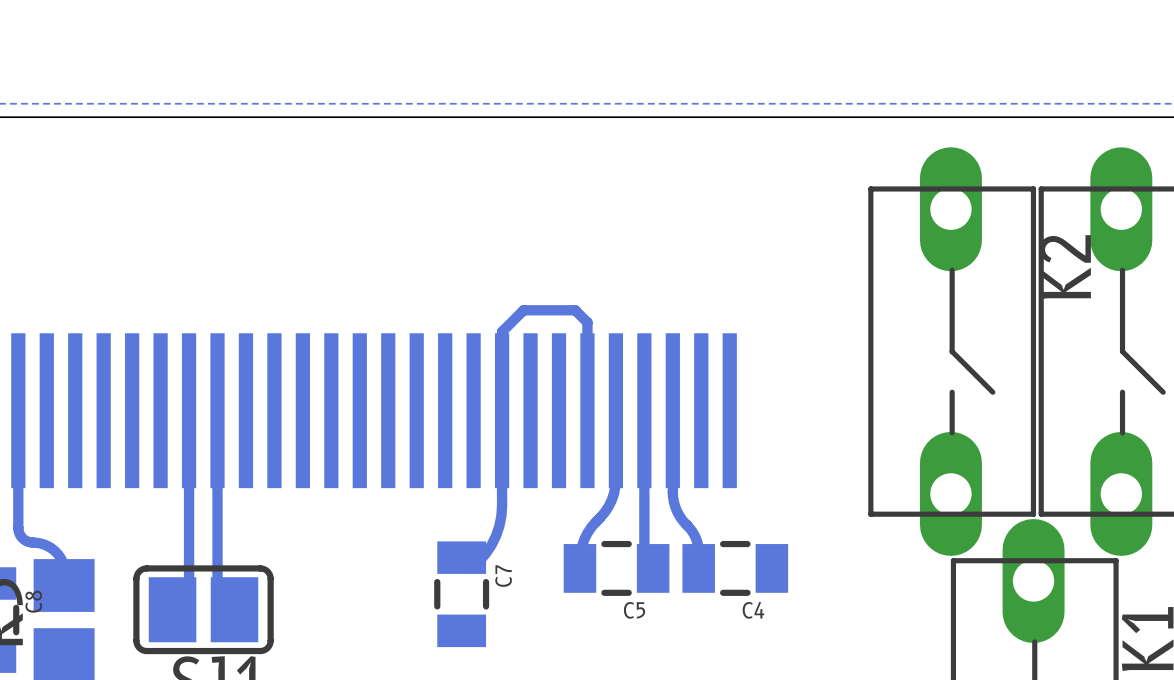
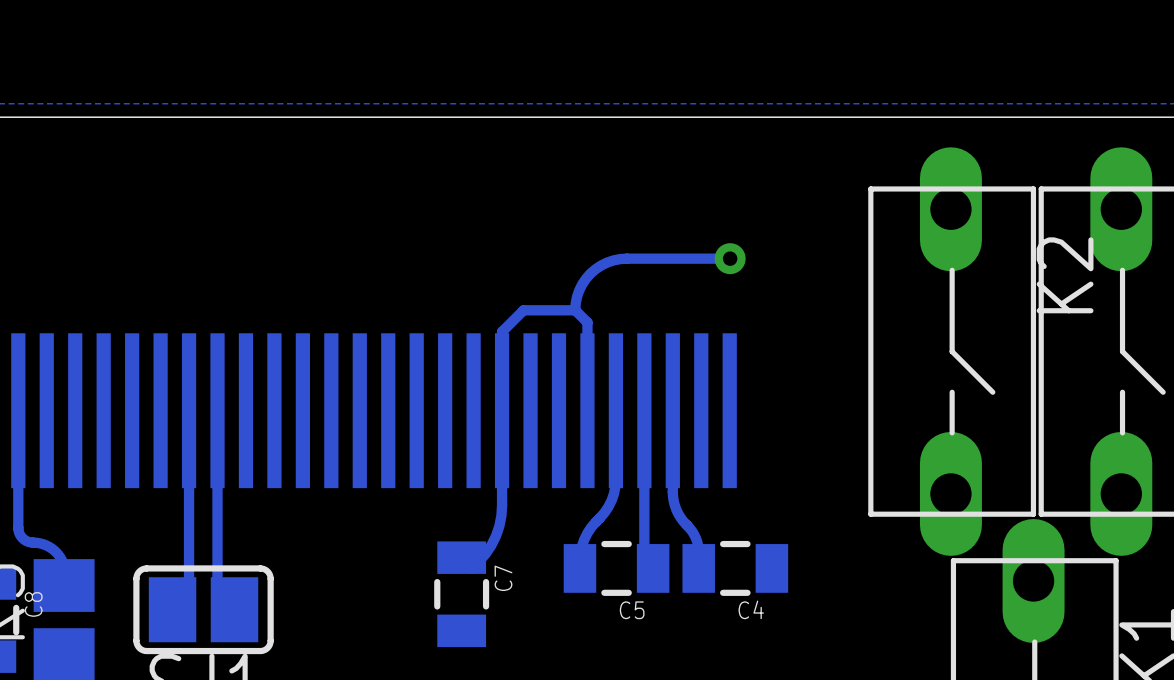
track: none -> (730, 258) (626, 258) (613, 260) (595, 269) (585, 278) (577, 296) (575, 310)
via: none -> (730, 258)

